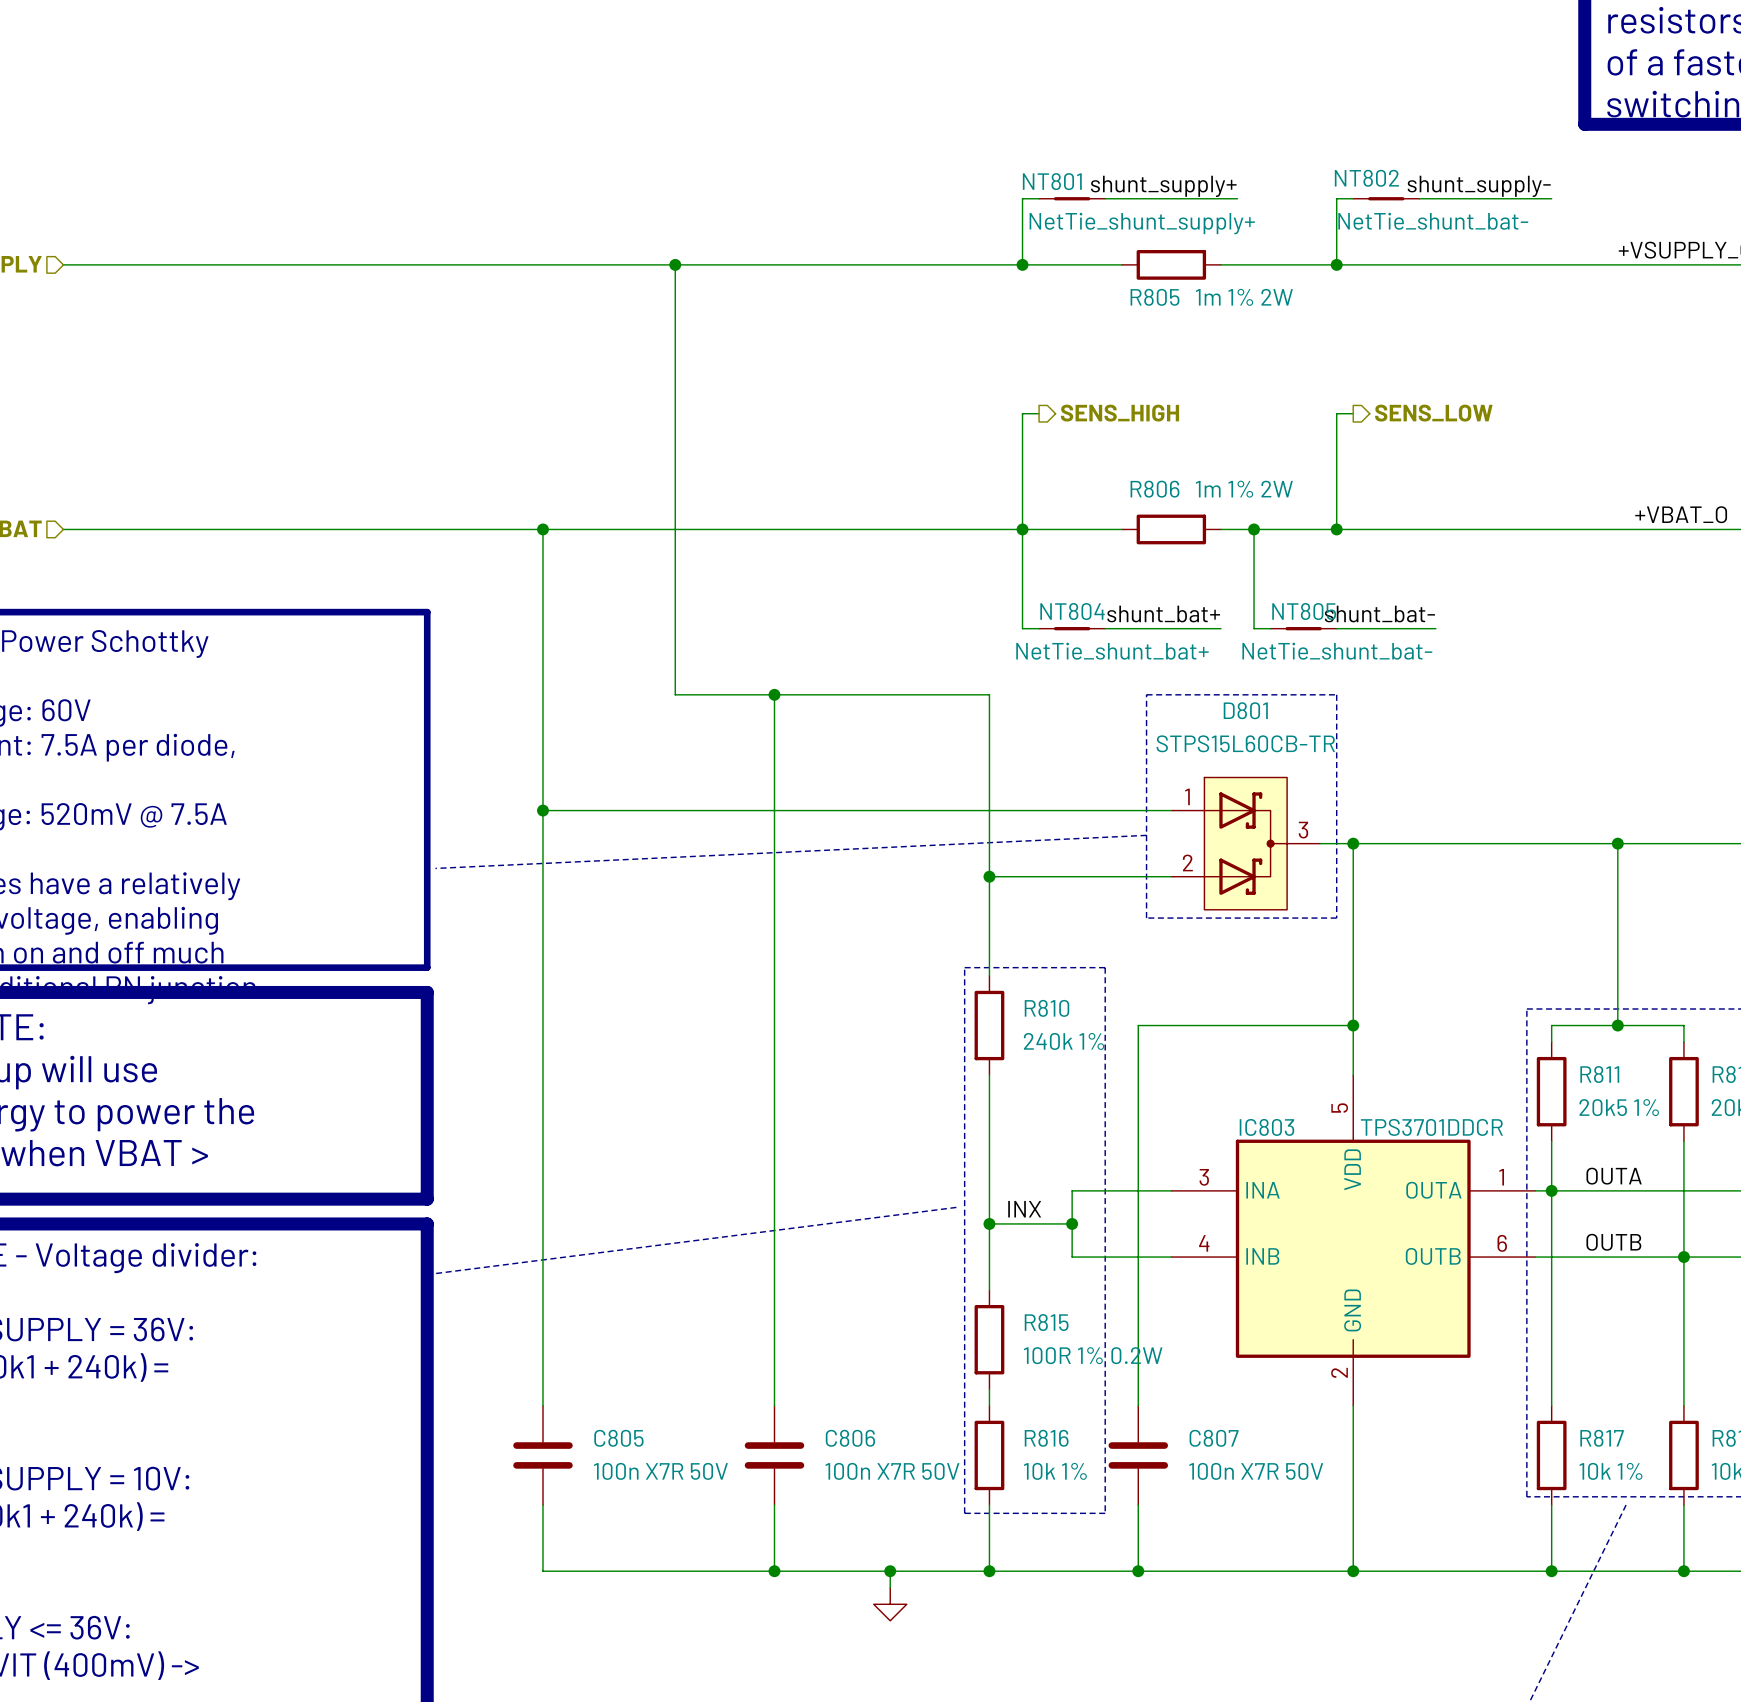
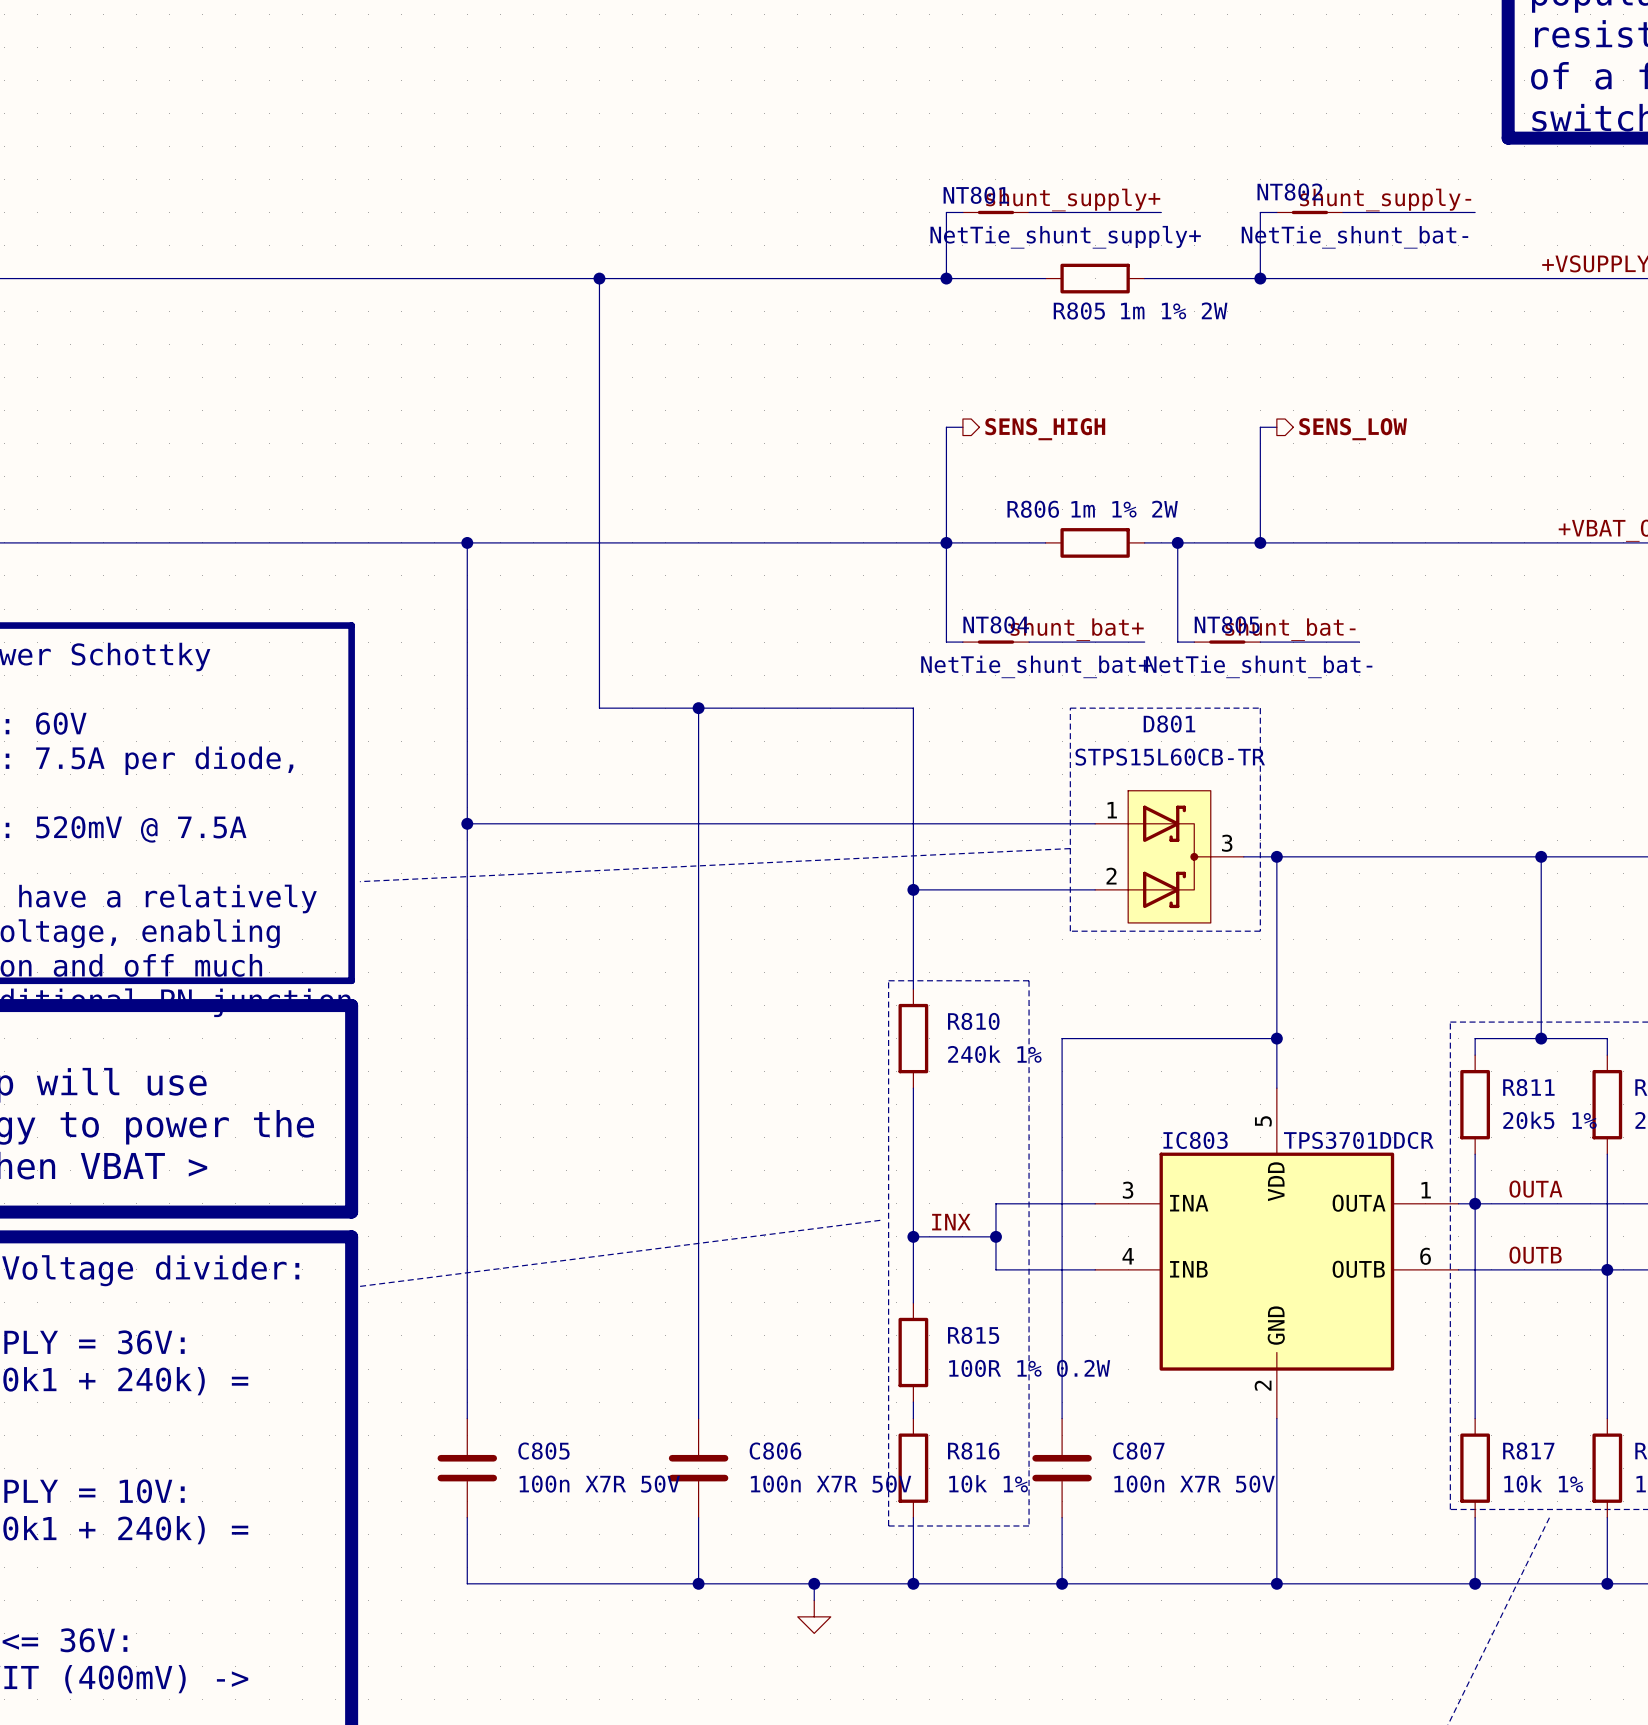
R806 name position: R806 (1155, 489) -> R806 (1033, 509)
R806 value position: 1m 1% 2W (1244, 489) -> 1m 1% 2W (1124, 509)

